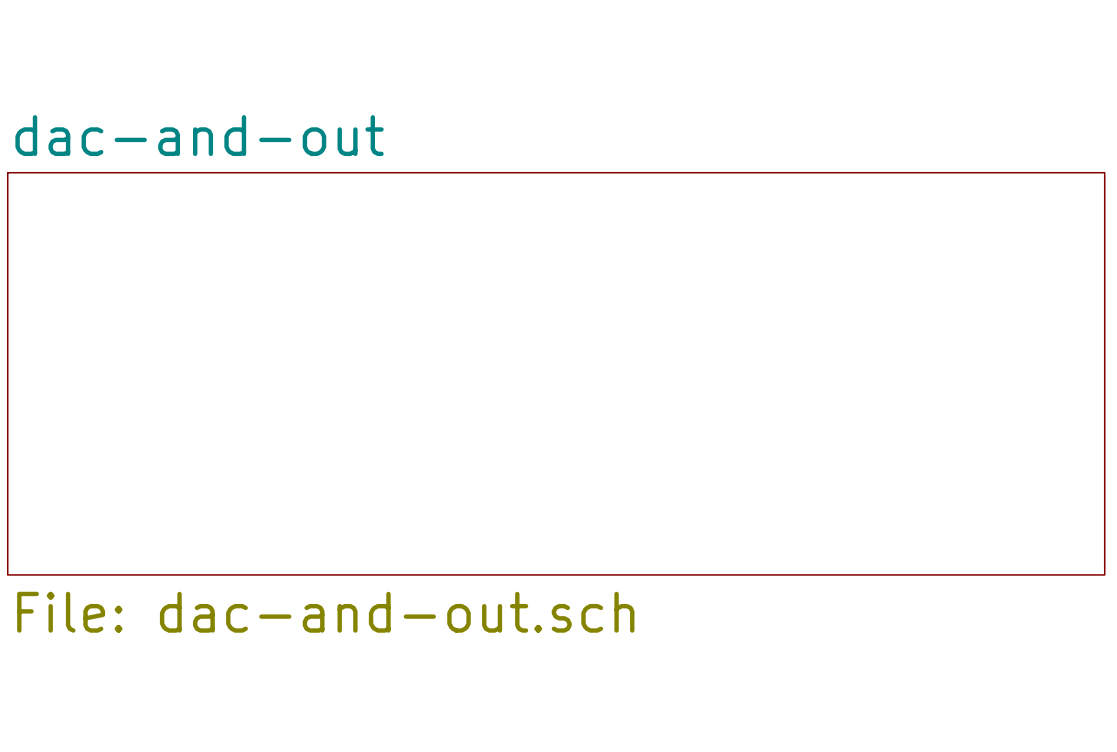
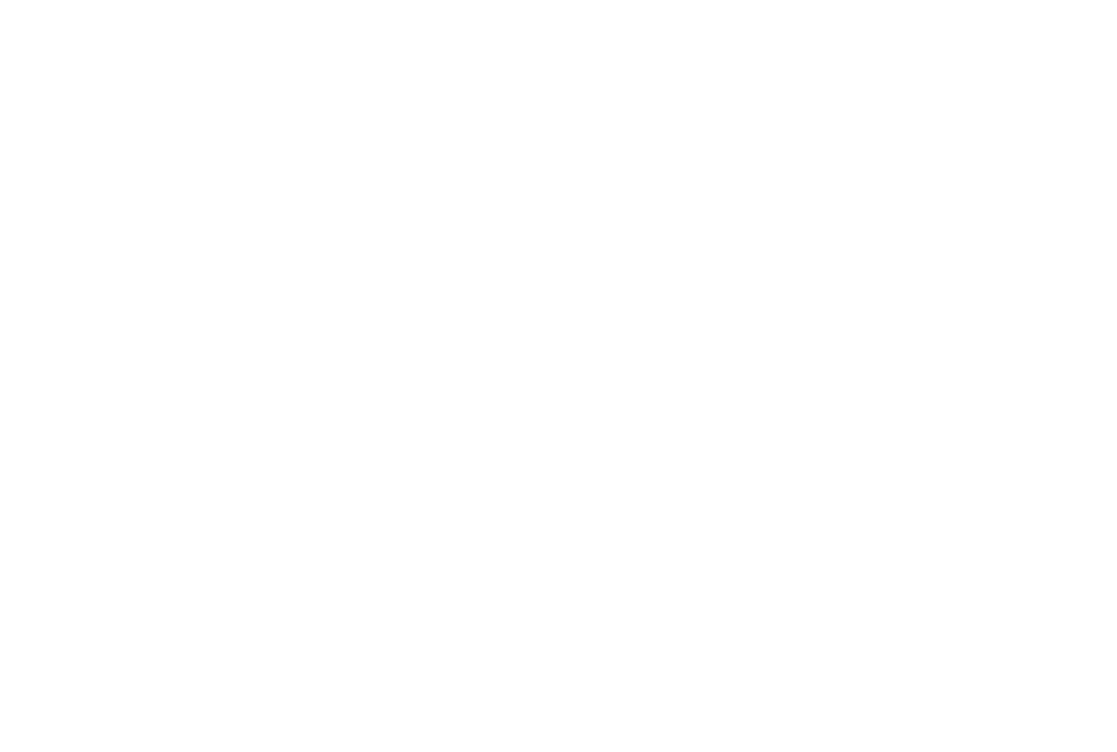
sheet dac-and-out: File: dac-and-out.sch (556, 373) -> none

